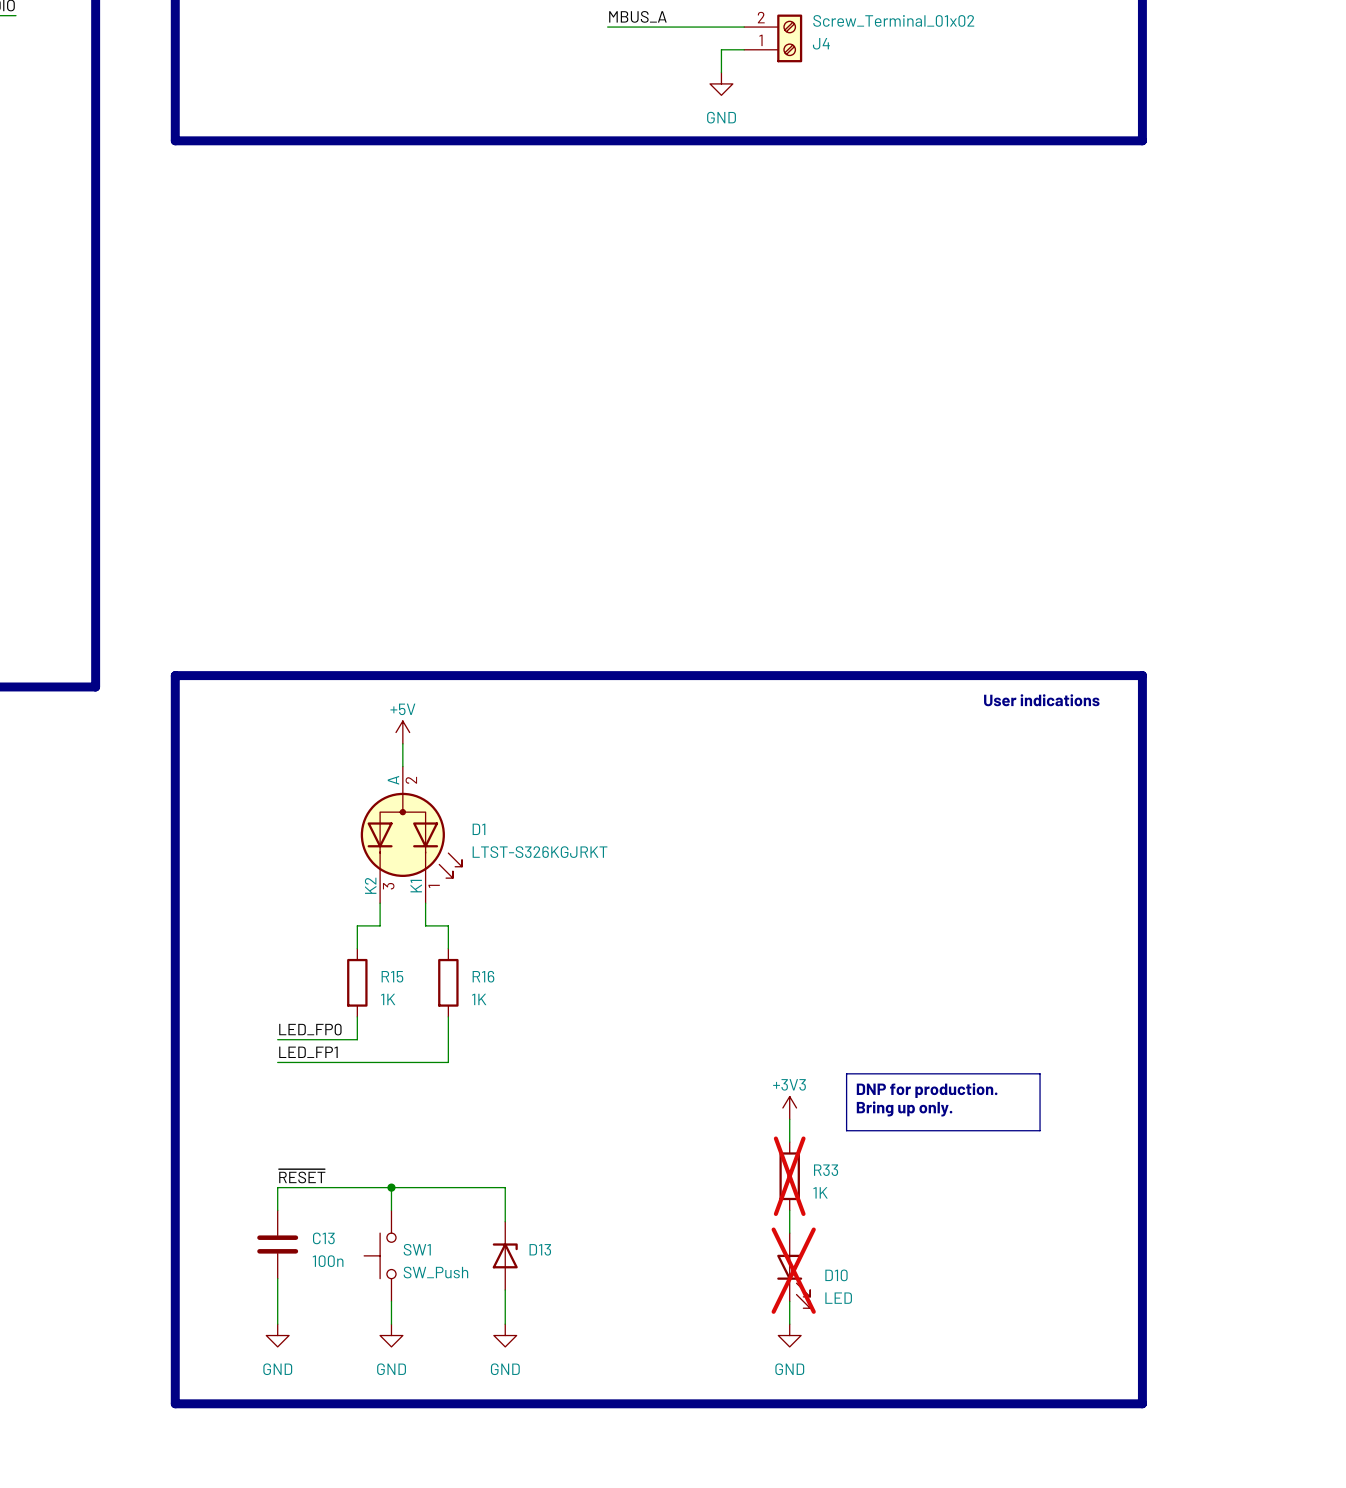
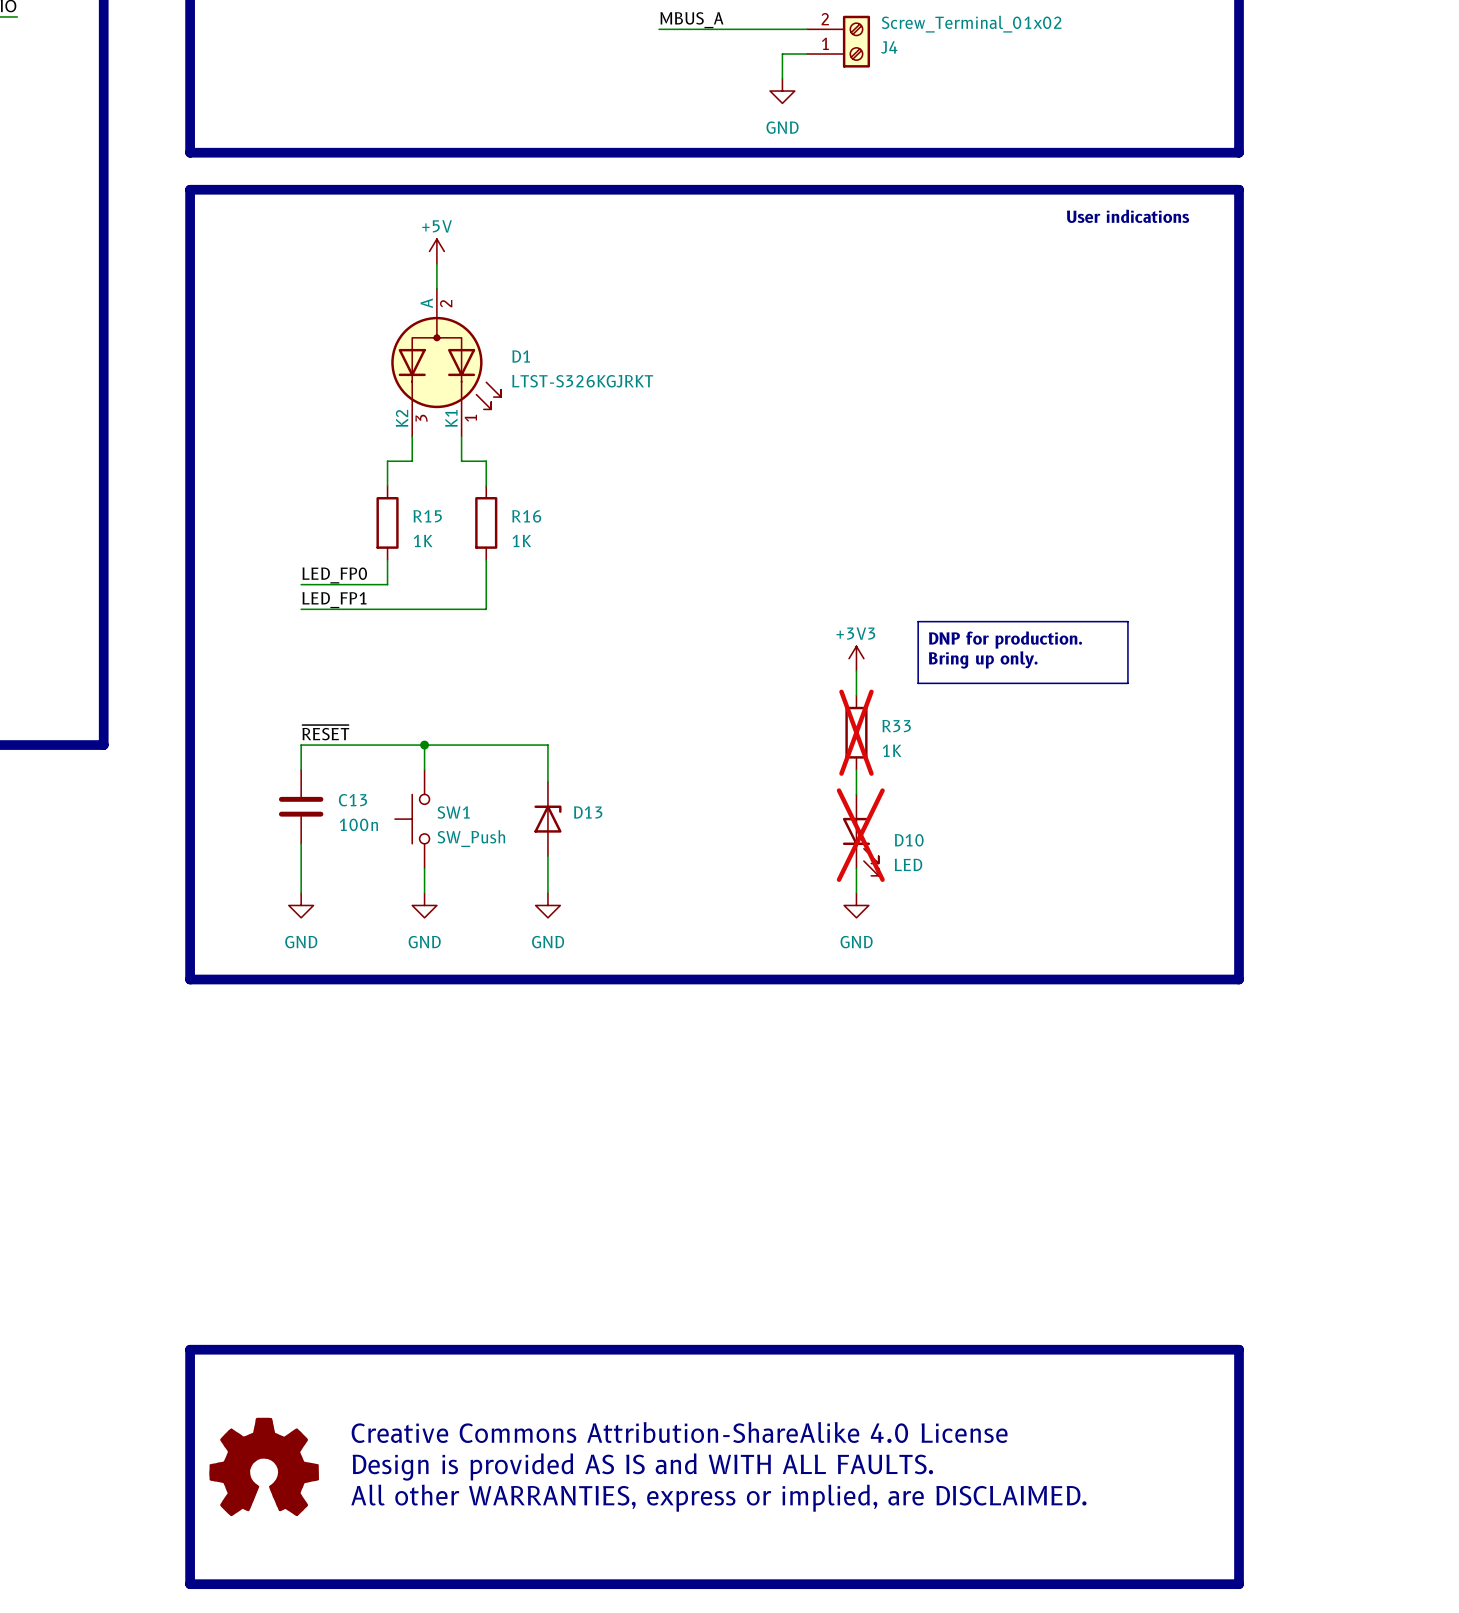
text: none -> User indications (1128, 216)
power symbol: none -> +5V (436, 251)
wire: none -> (436, 263) (436, 288)
wire: none -> (412, 436) (412, 461) (387, 461) (387, 485)
wire: none -> (461, 436) (461, 461) (486, 461) (486, 485)
wire: none -> (387, 559) (387, 584) (301, 584)
wire: none -> (486, 559) (486, 609) (301, 609)
label: none -> LED_FP0 (334, 575)
label: none -> LED_FP1 (334, 600)
line: none -> (918, 621) (1127, 621) (1127, 683) (918, 683) (918, 621)
text: none -> DNP for production. (1005, 640)
power symbol: none -> +3V3 (856, 658)
text: none -> Bring up only. (983, 659)
wire: none -> (856, 671) (856, 695)
line: (175, 675) (1142, 675) -> (190, 732) (190, 189) (1239, 189) (1239, 732)
label: none -> ~{RESET} (325, 732)
junction: none -> (424, 745)
text: User indications (1041, 700) -> none
wire: none -> (301, 769) (301, 745) (547, 745) (547, 782)
wire: none -> (856, 769) (856, 794)
power symbol: +5V (402, 732) -> none
wire: (402, 743) (402, 766) -> (424, 745) (424, 769)
wire: none -> (301, 843) (301, 893)
wire: none -> (547, 856) (547, 893)
wire: none -> (856, 868) (856, 893)
power symbol: none -> GND (301, 905)
power symbol: none -> GND (424, 905)
D1 position: (411, 834) -> (446, 362)
power symbol: none -> GND (547, 905)
power symbol: none -> GND (856, 905)
line: (175, 903) (175, 1244) -> (190, 979) (1239, 979)
wire: (380, 903) (380, 925) (357, 925) (357, 948) -> none
wire: (425, 903) (425, 925) (448, 925) (448, 948) -> none
line: (1142, 903) (1142, 1244) -> (190, 1349) (1239, 1349)
R15 position: (357, 982) -> (387, 522)
R16 position: (448, 982) -> (486, 522)
wire: (357, 1016) (357, 1039) (277, 1039) -> none
wire: (448, 1016) (448, 1062) (277, 1062) -> none
label: LED_FP0 (310, 1029) -> none
label: LED_FP1 (308, 1052) -> none
line: (846, 1073) (1040, 1073) (1040, 1130) (846, 1130) (846, 1073) -> none
text: DNP for production. (927, 1090) -> none
power symbol: +3V3 (789, 1107) -> none
text: Bring up only. (904, 1108) -> none
wire: (789, 1119) (789, 1142) -> none
label: ~{RESET} (302, 1176) -> none
R33 position: (789, 1176) -> (856, 732)
wire: (391, 1187) (391, 1210) -> none
junction: (391, 1187) -> none
wire: (277, 1210) (277, 1187) (505, 1187) (505, 1221) -> none
wire: (789, 1210) (789, 1233) -> none
C13 position: (277, 1244) -> (301, 806)
SW1 position: (380, 1255) -> (412, 819)
D13 position: (505, 1255) -> (547, 819)
D10 position: (793, 1270) -> (860, 835)
wire: (277, 1278) (277, 1324) -> none
wire: (505, 1290) (505, 1324) -> none
wire: (391, 1301) (391, 1324) -> none
wire: (789, 1301) (789, 1324) -> none
text: none -> Creative Commons Attribution-ShareAlike 4.0 License (679, 1432)
power symbol: GND (277, 1335) -> none
power symbol: GND (391, 1335) -> none
power symbol: GND (505, 1335) -> none
power symbol: GND (789, 1335) -> none
power symbol: none -> (264, 1466)
text: none -> Design is provided AS IS and WITH ALL FAULTS. (642, 1466)
text: none -> All other WARRANTIES, express or implied, are DISCLAIMED. (718, 1498)
line: (175, 1403) (1142, 1403) -> (190, 1522) (190, 1584) (1239, 1584) (1239, 1522)

